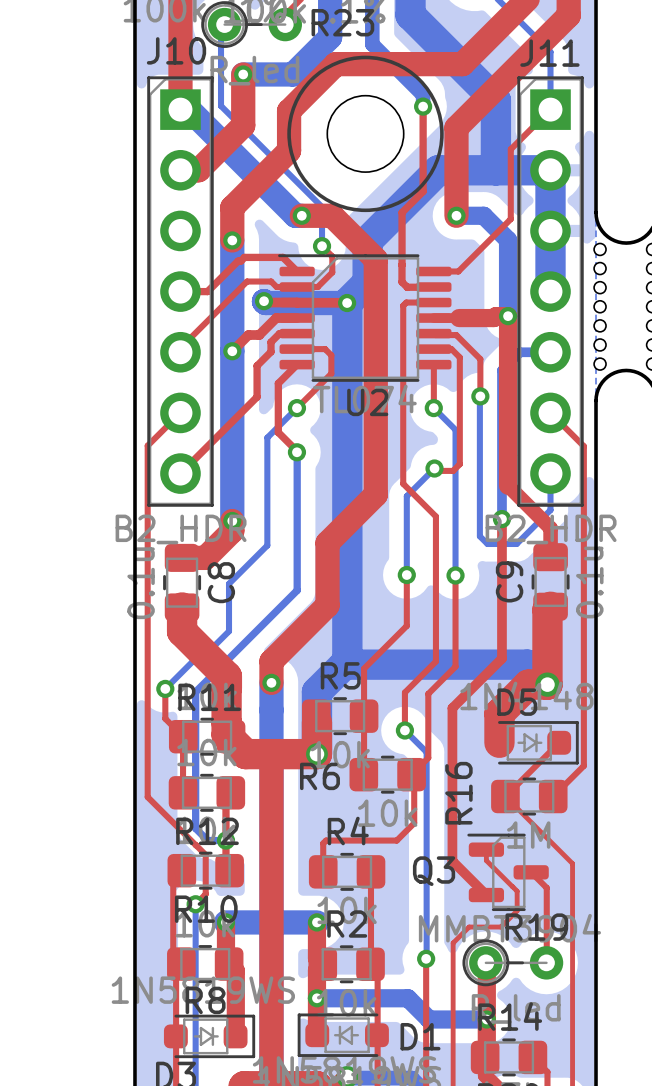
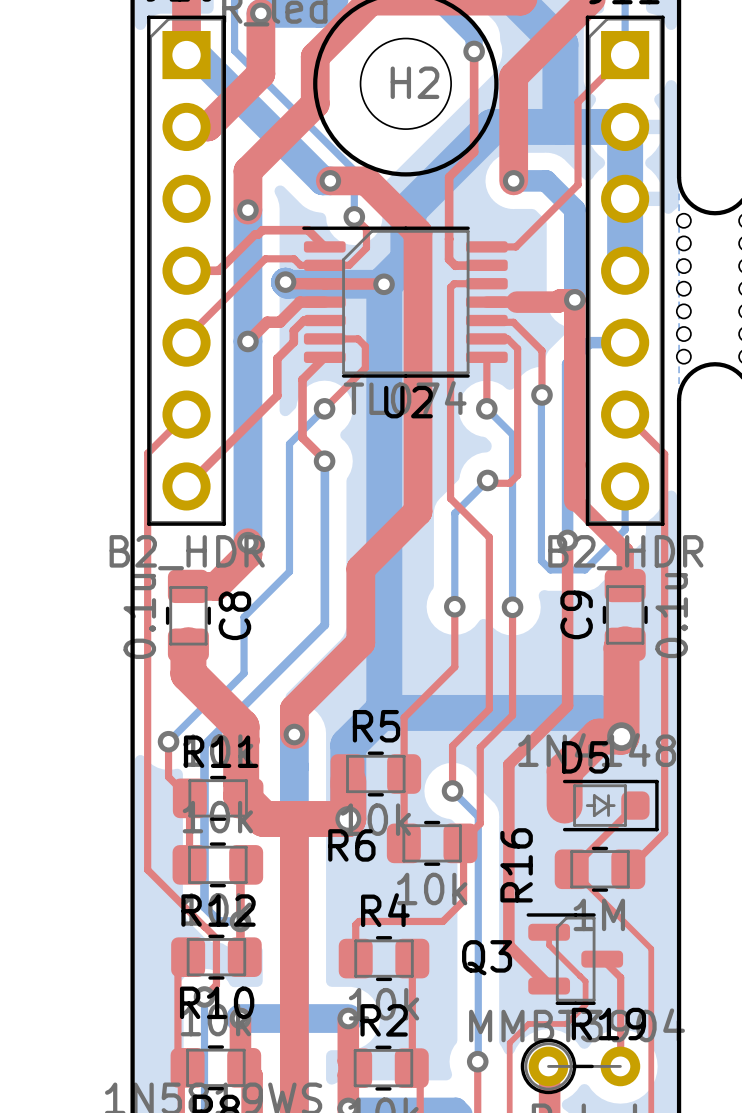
H2 name: none -> H2 (414, 82)

